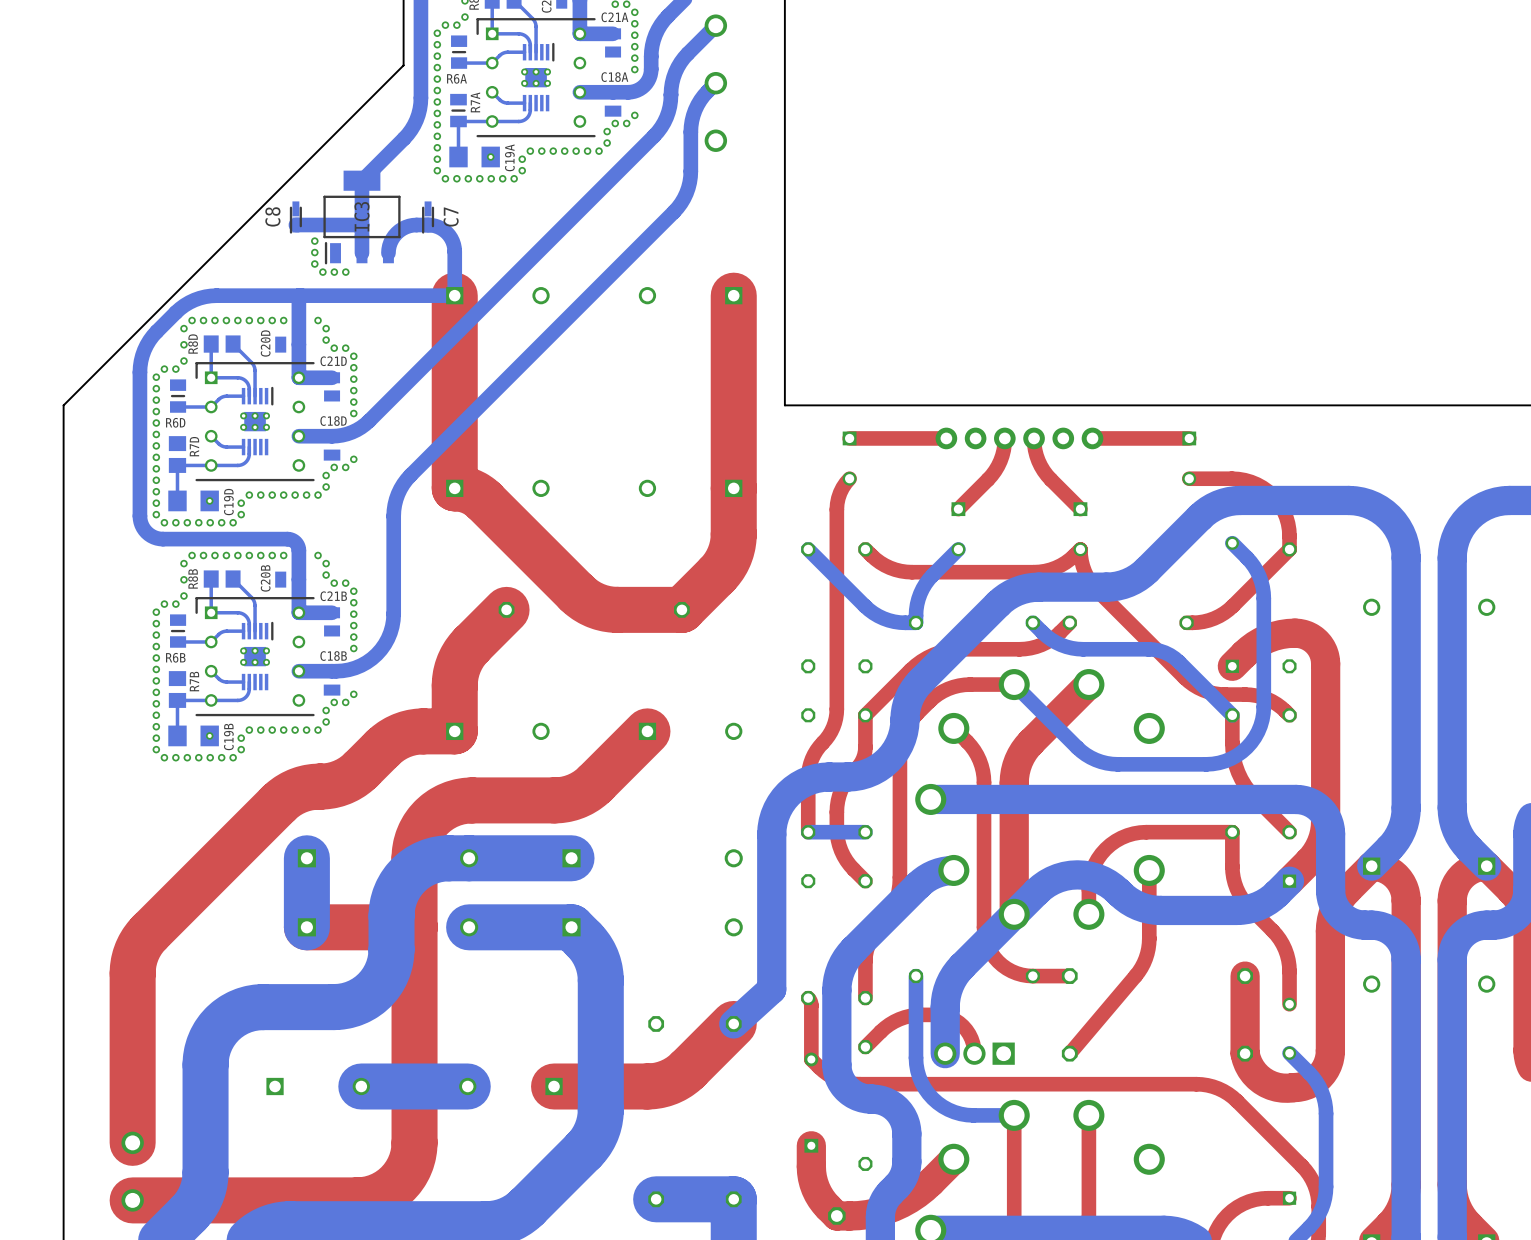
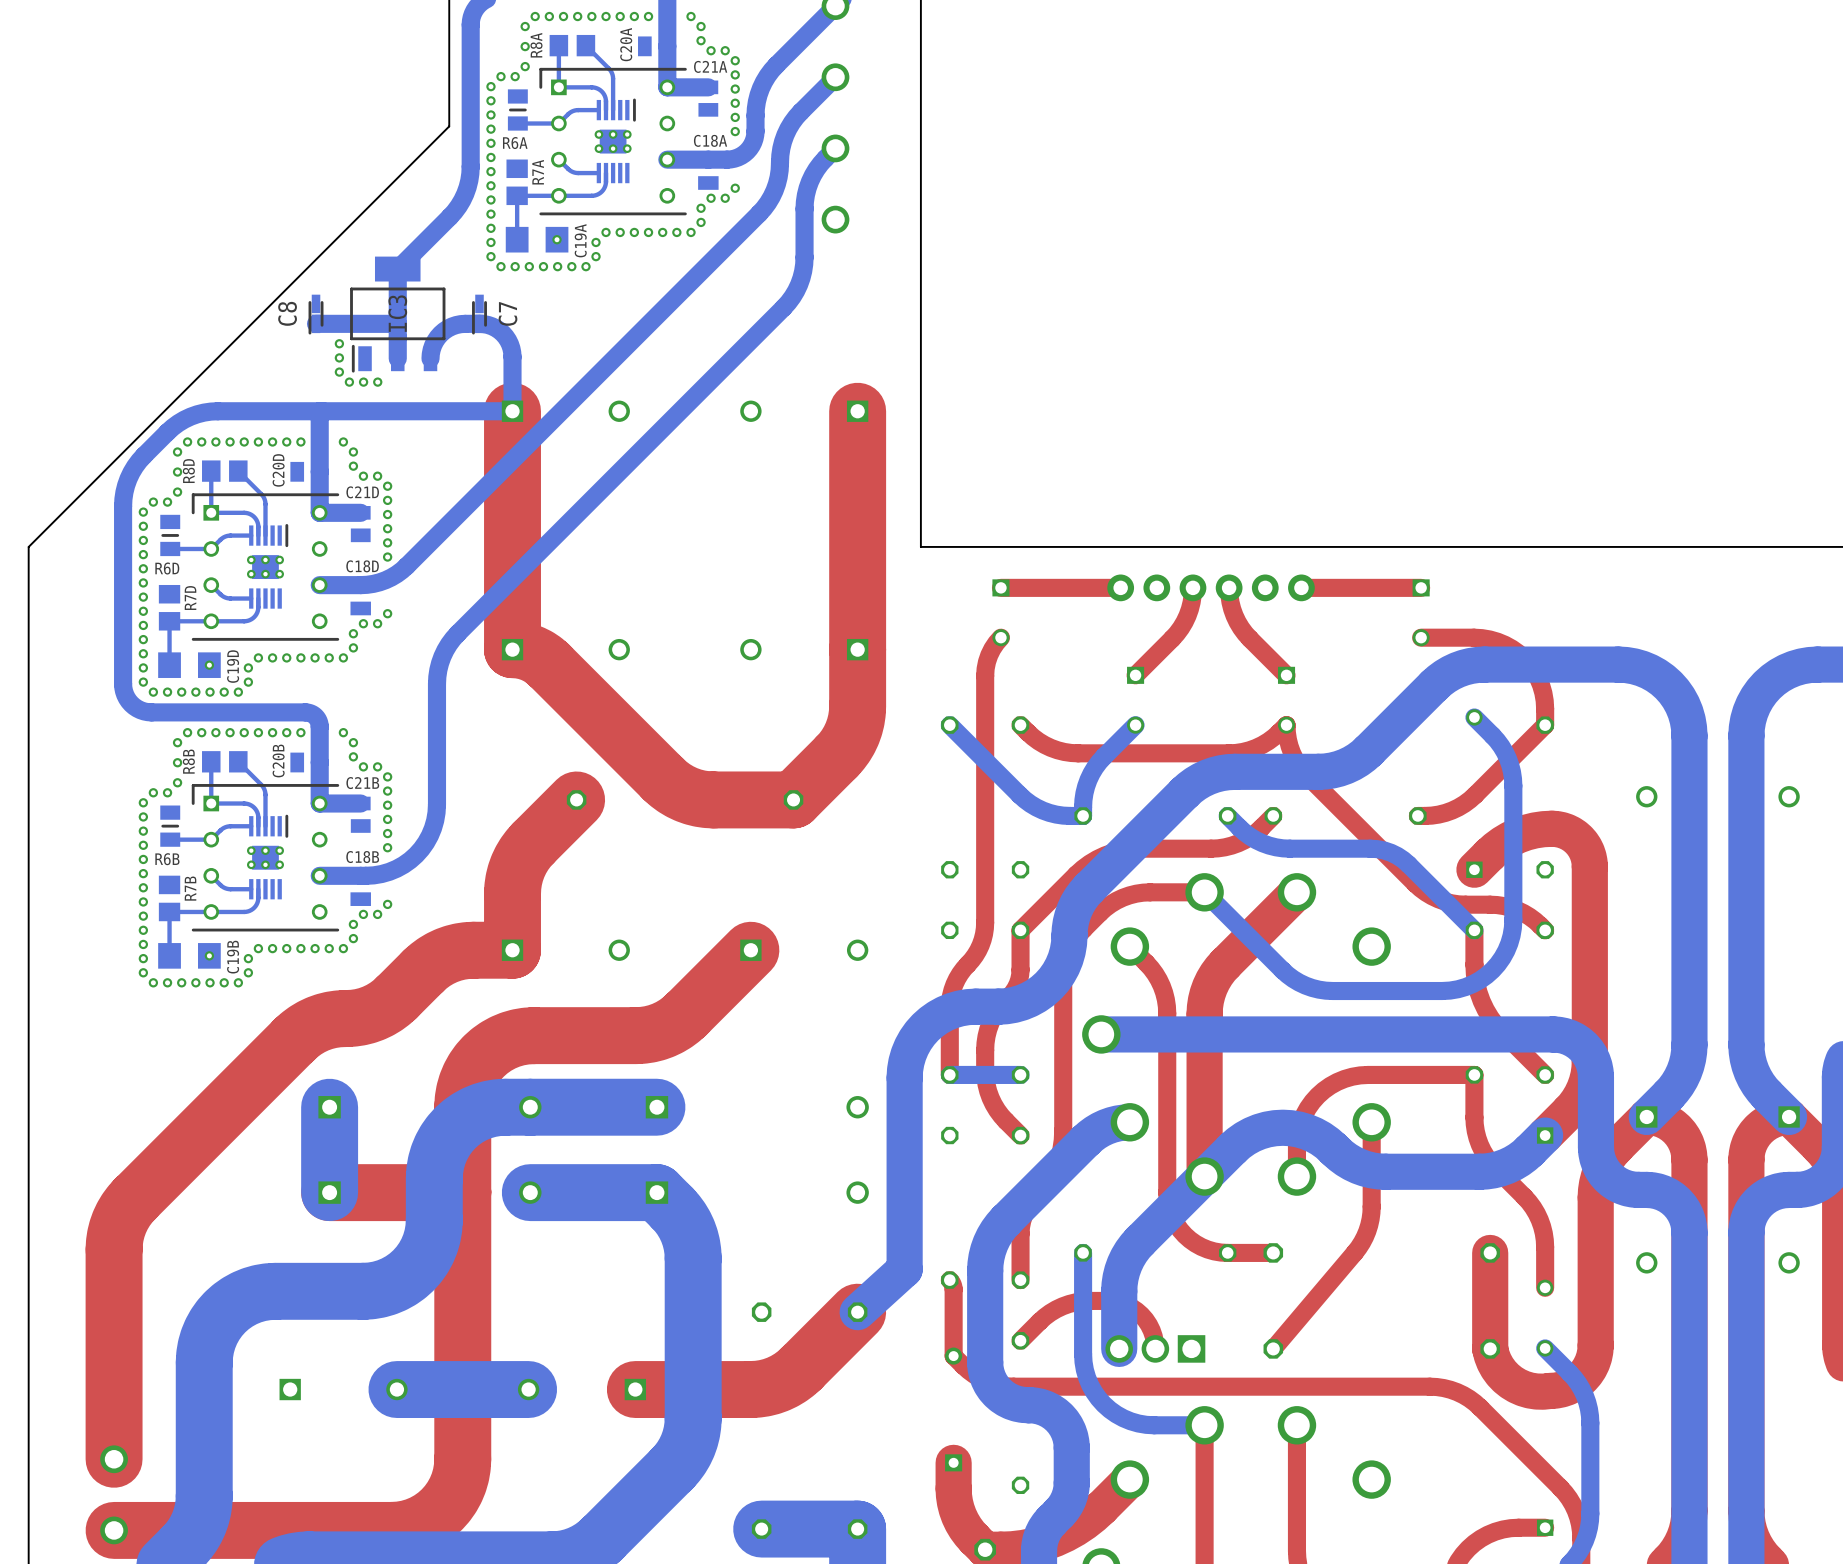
R7A footprint: [450, 93, 467, 128] -> [506, 159, 528, 206]

